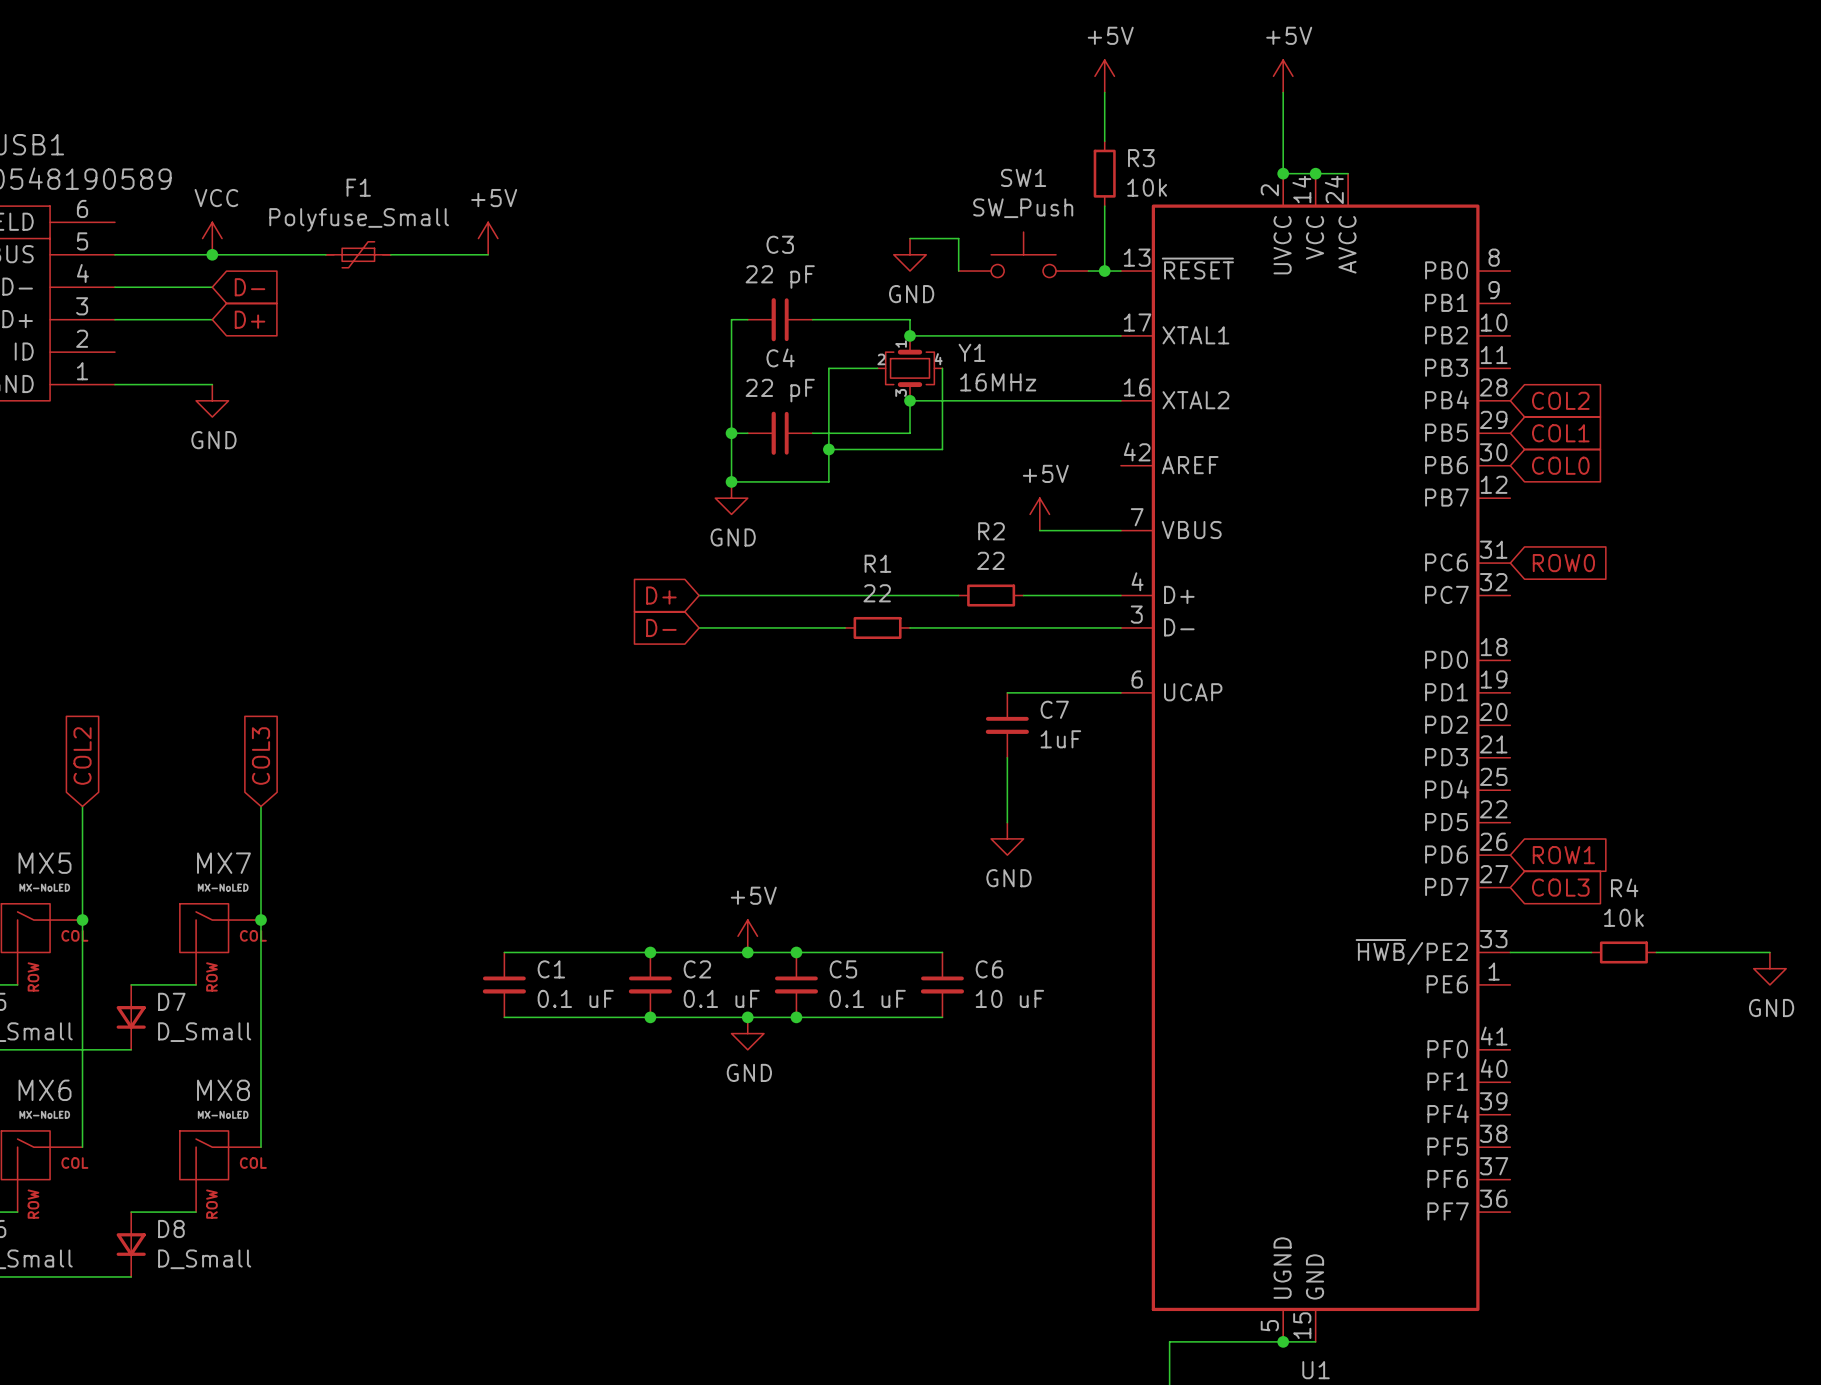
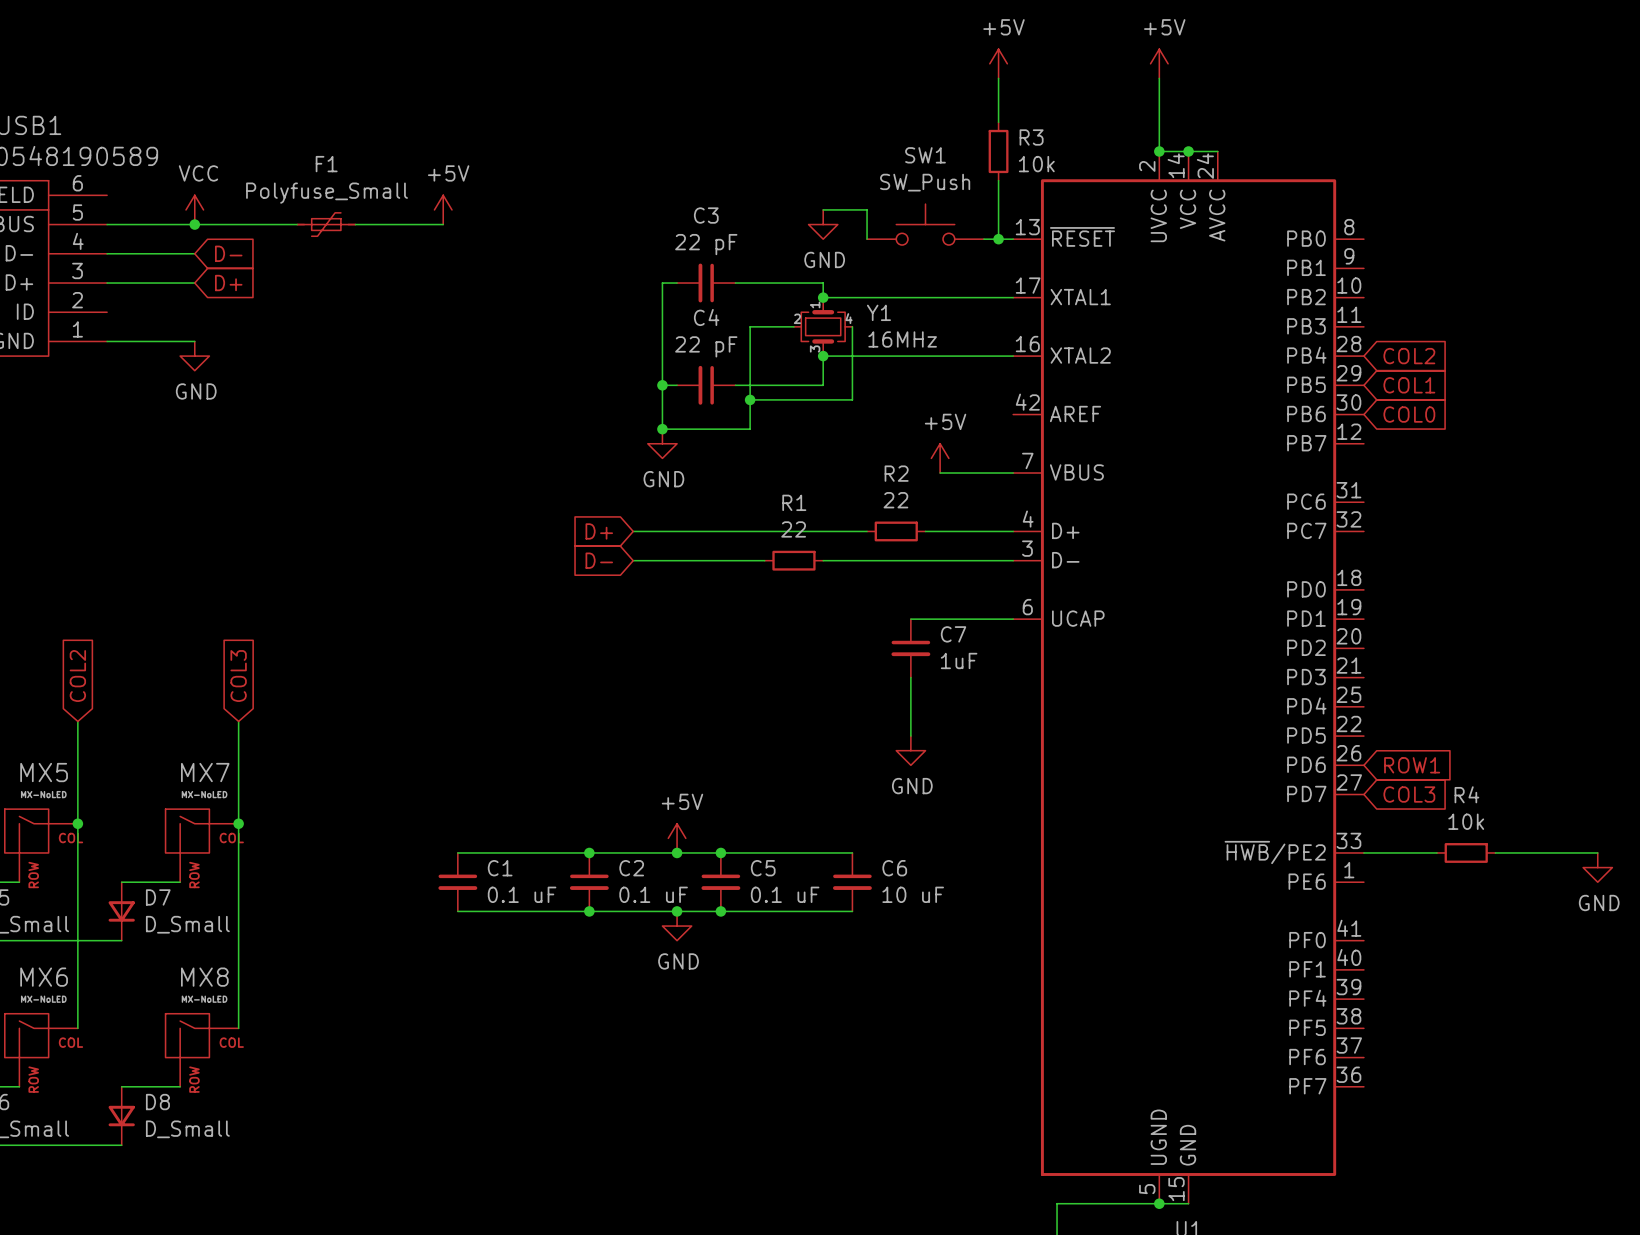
global label: ROW0 (1563, 563) -> none

